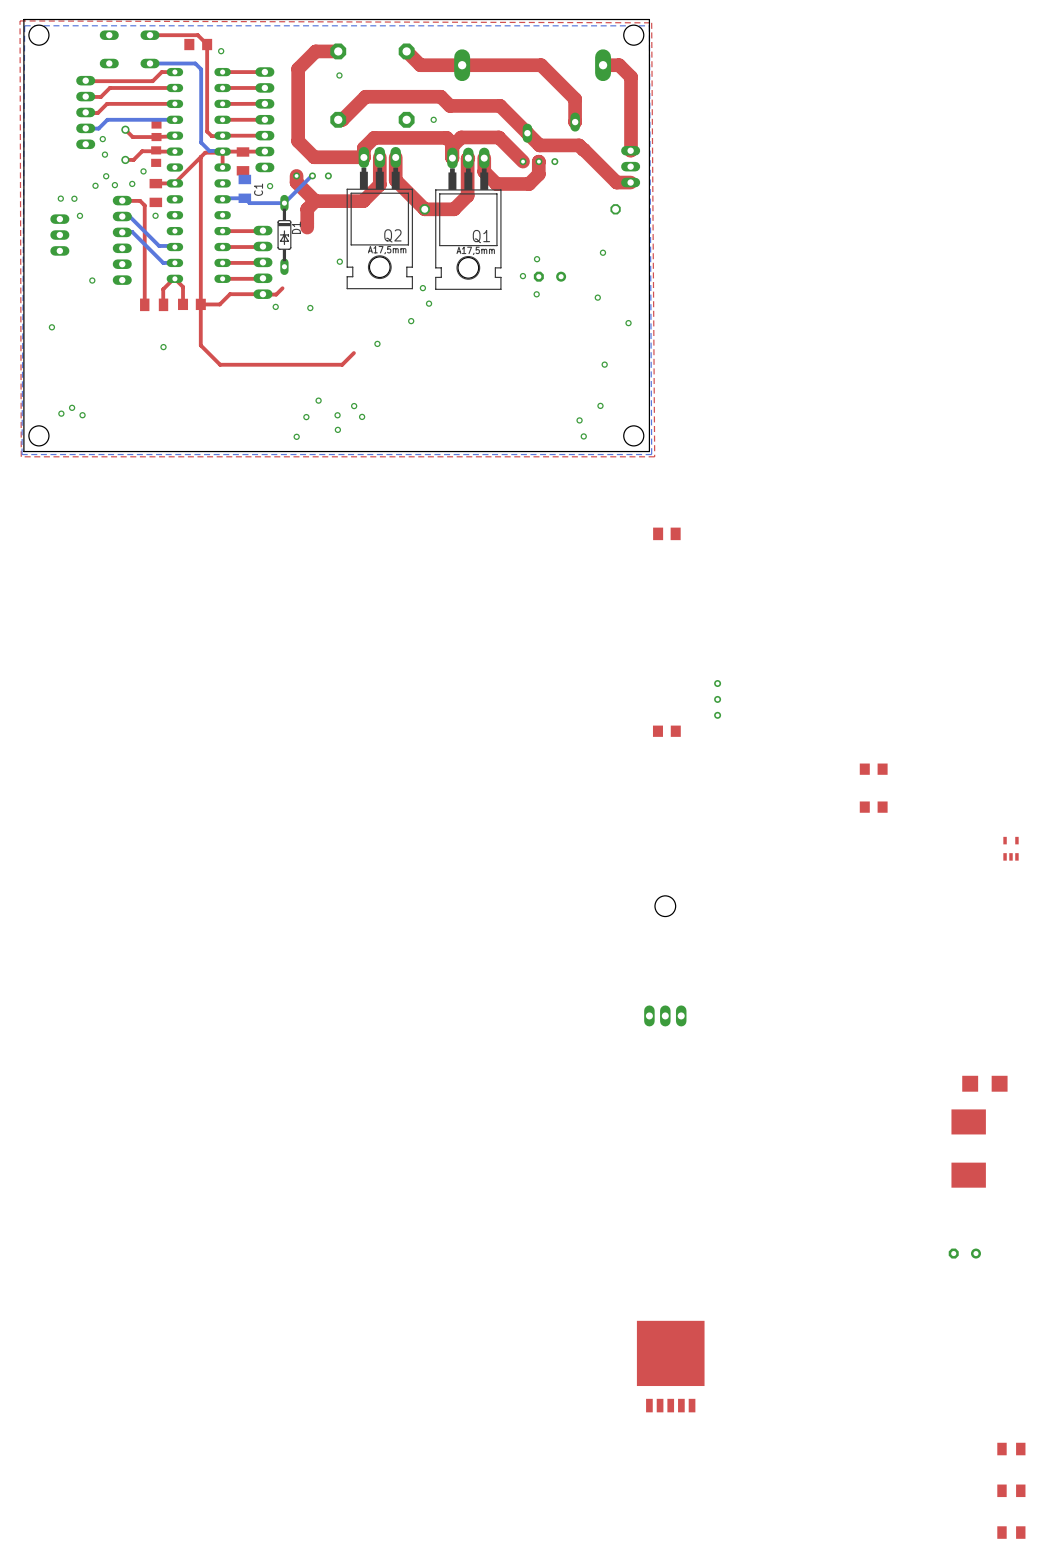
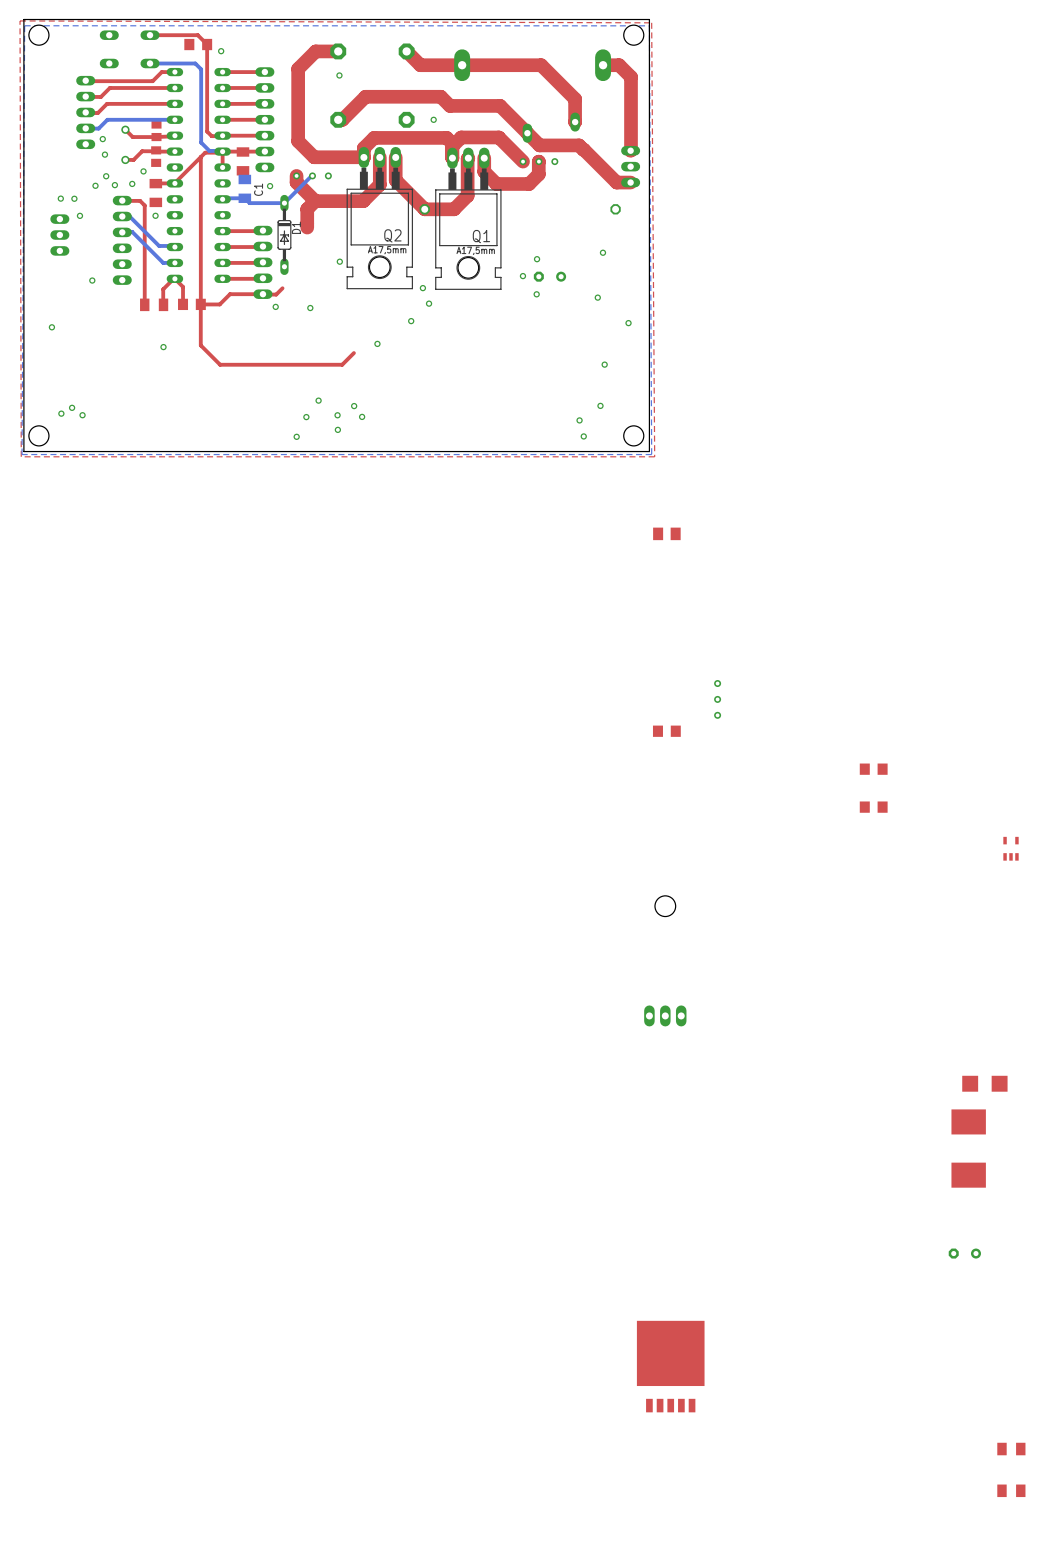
part: (1011, 1532) -> none

